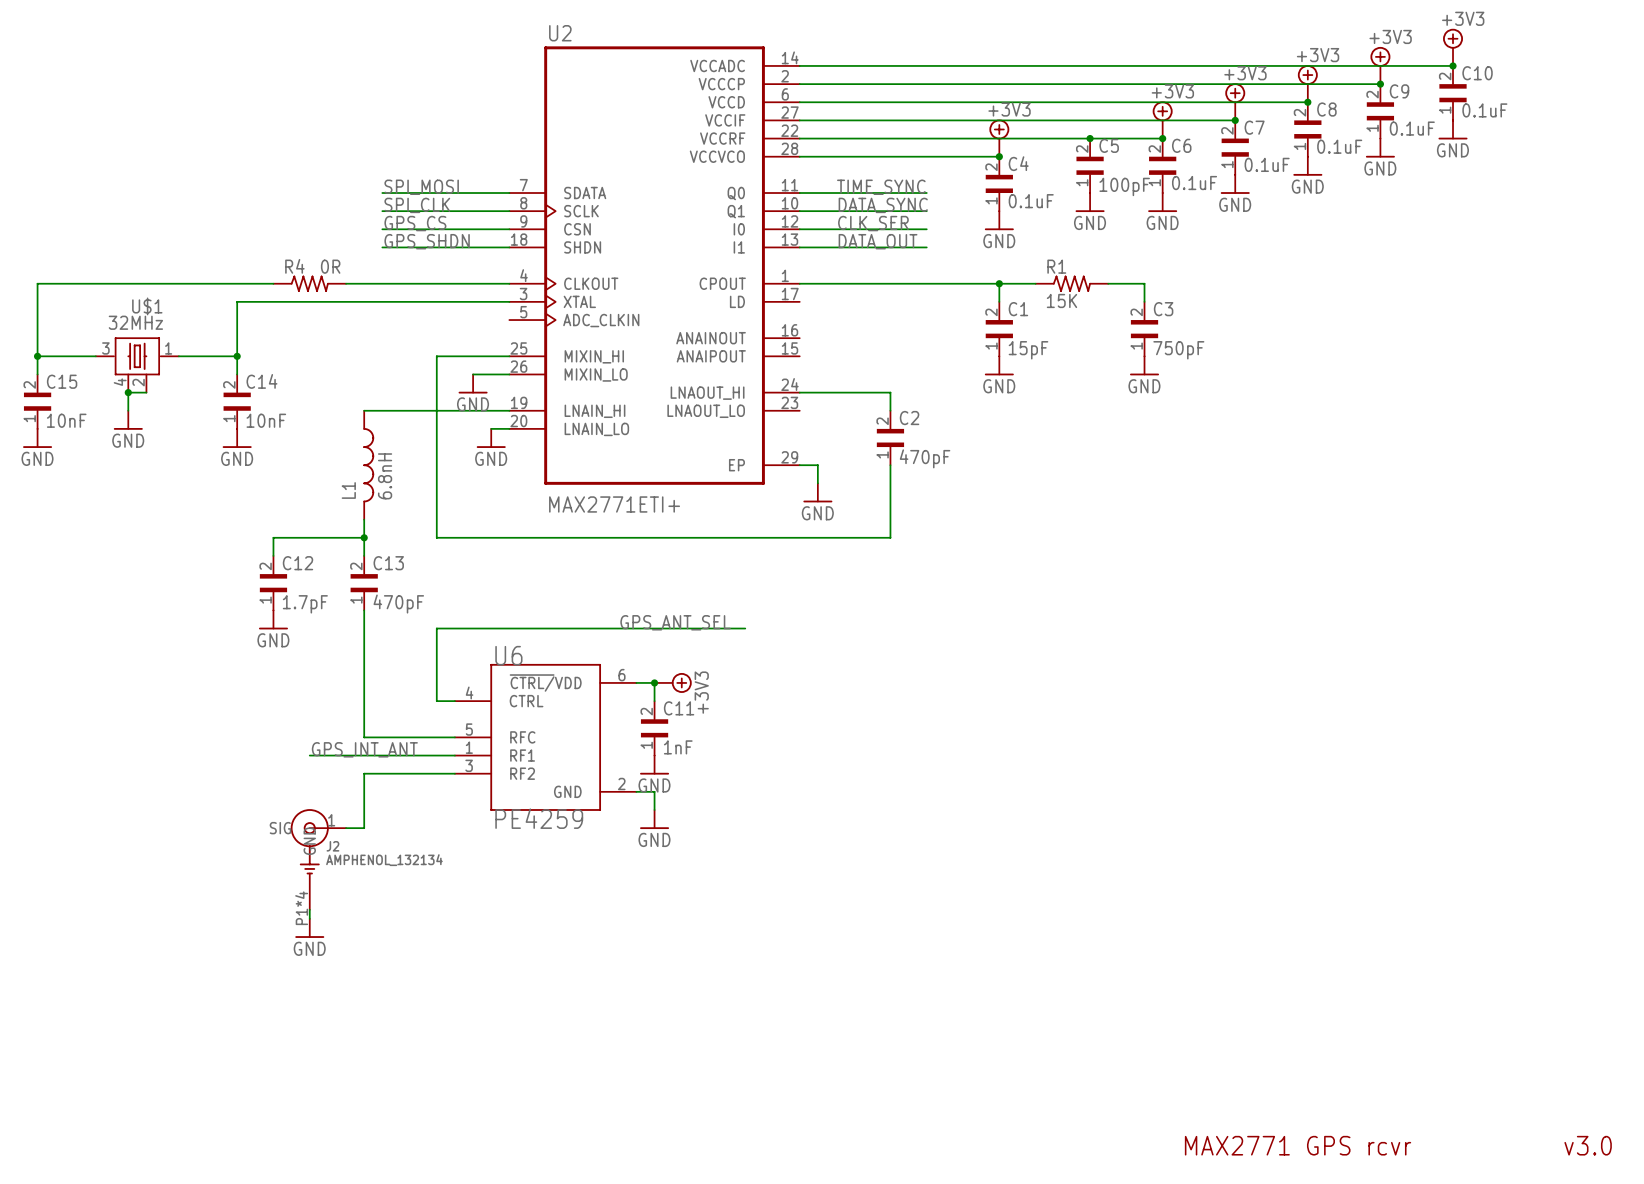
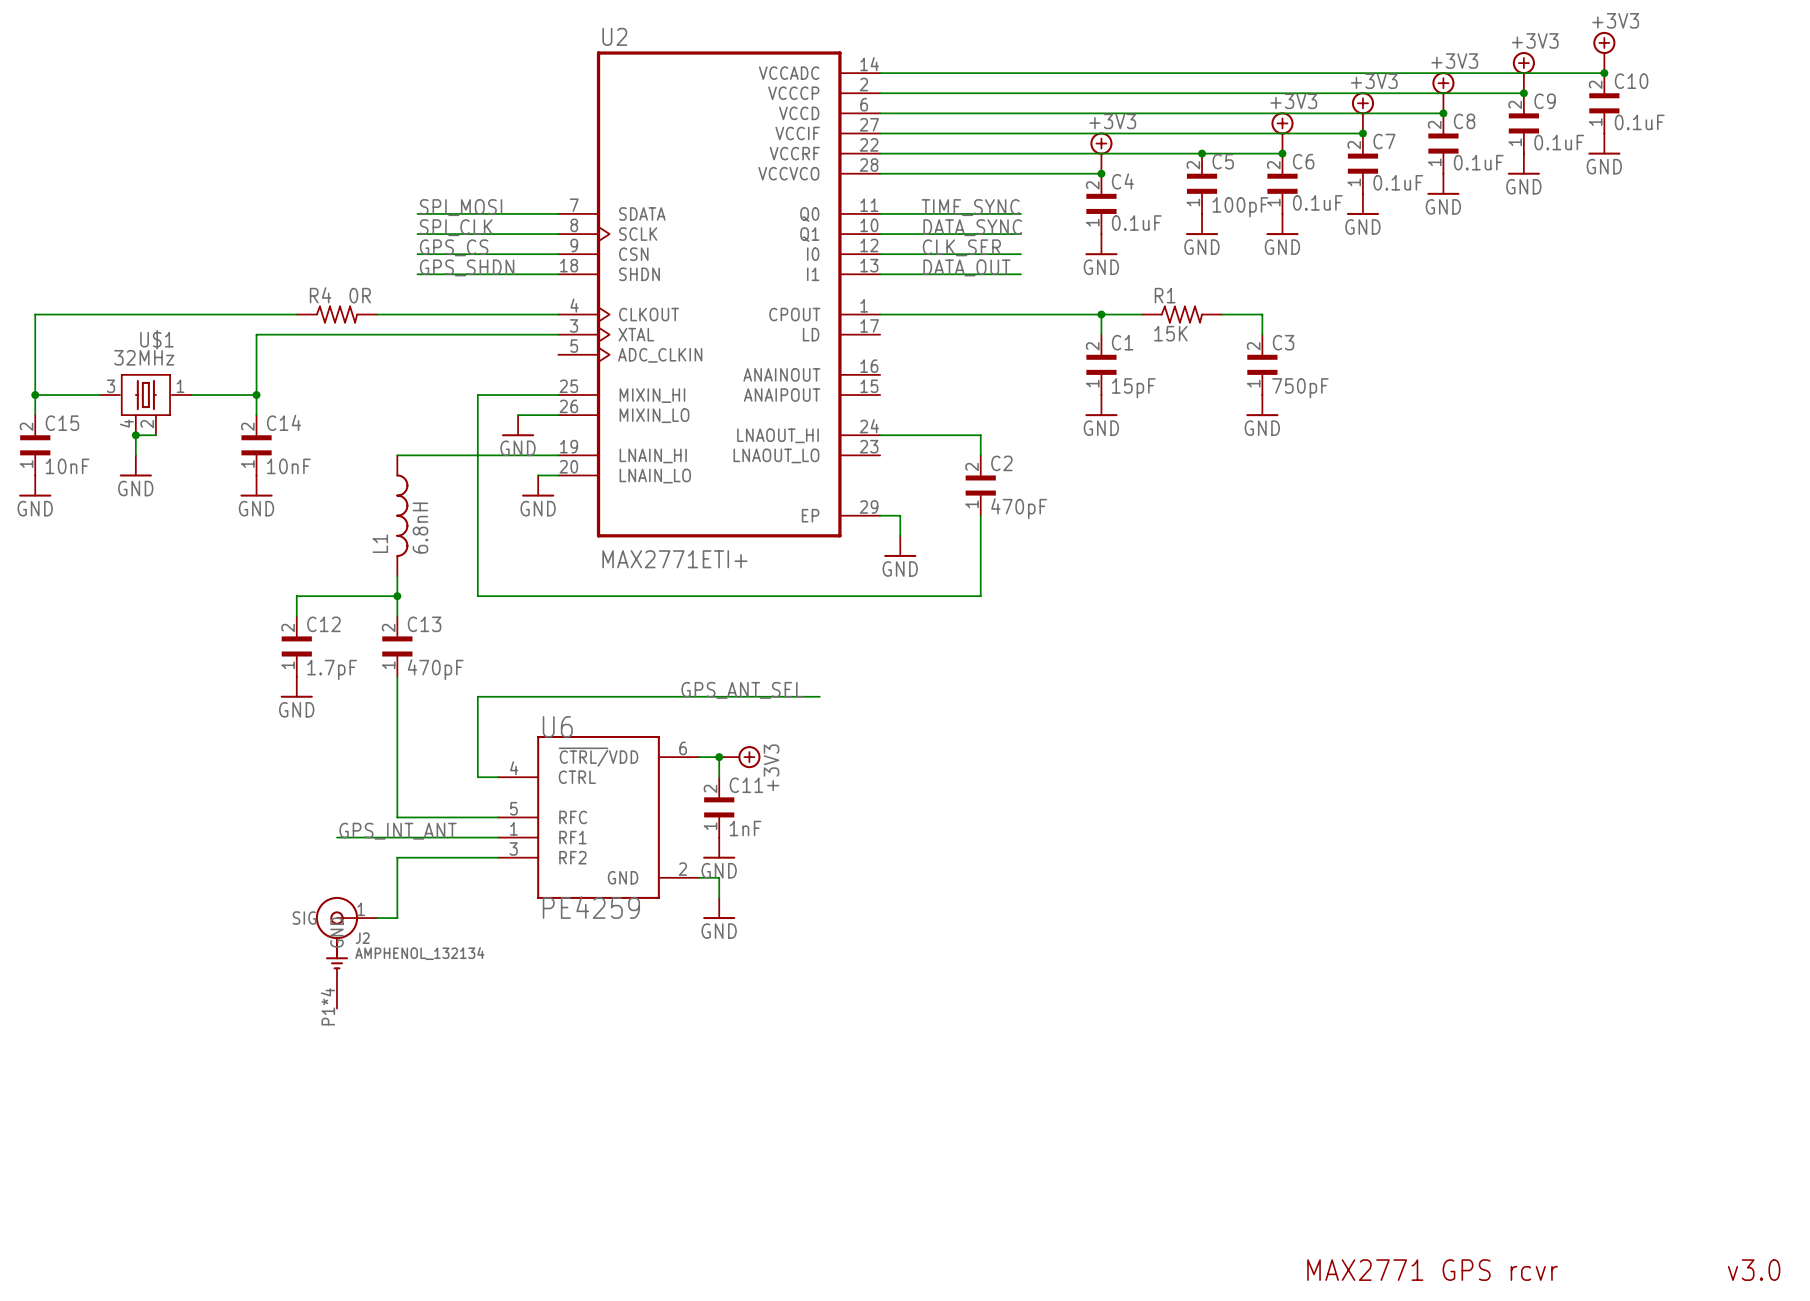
wire: (309, 909) (309, 918) -> none
power symbol: GND (309, 928) -> none

